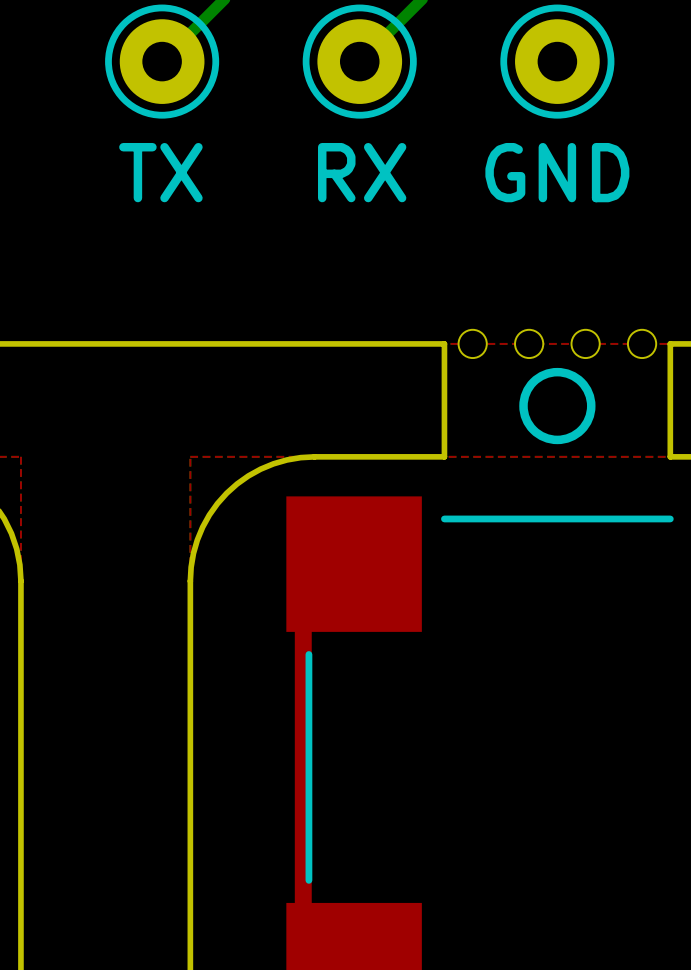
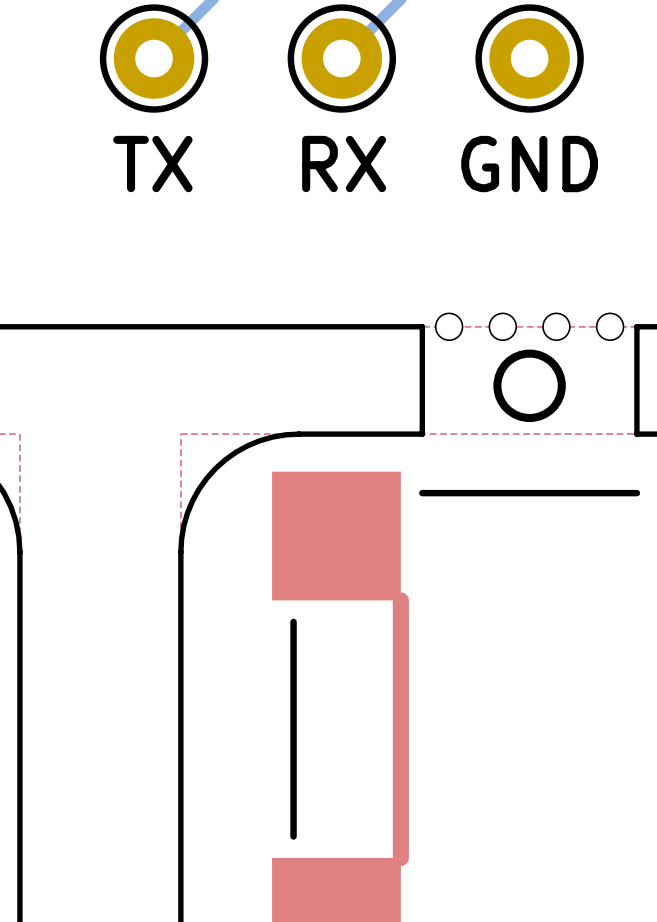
top track: (303, 631) (303, 902) -> (400, 600) (400, 857)

